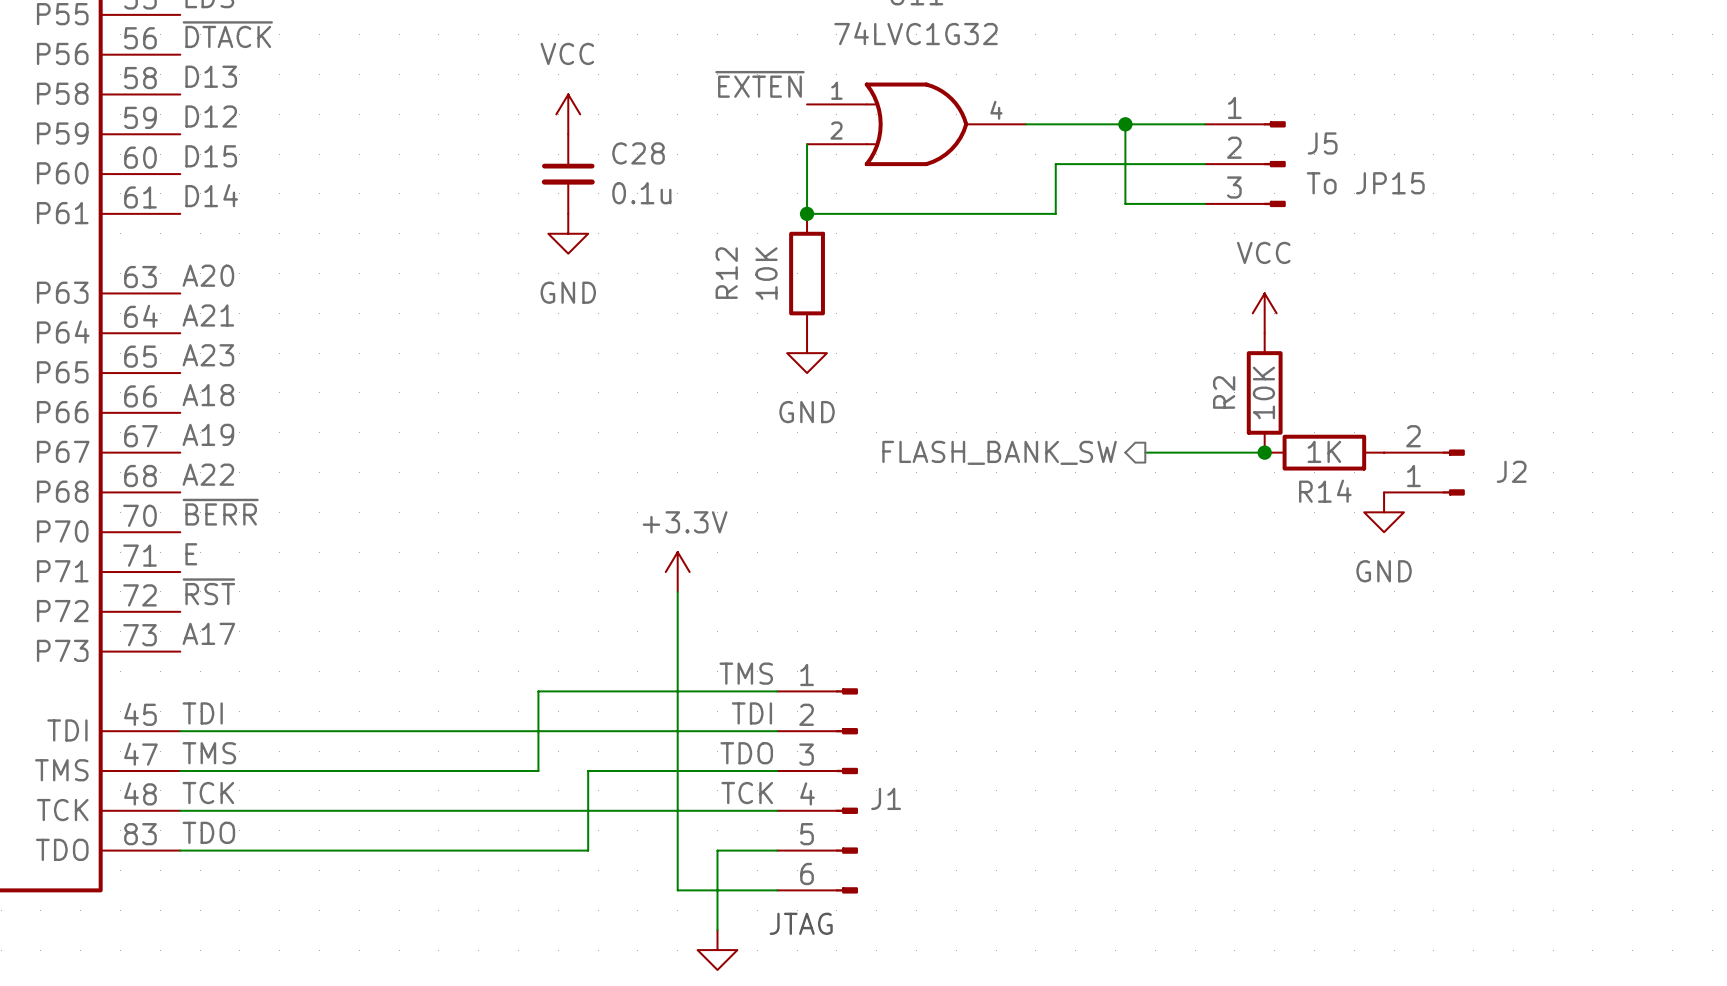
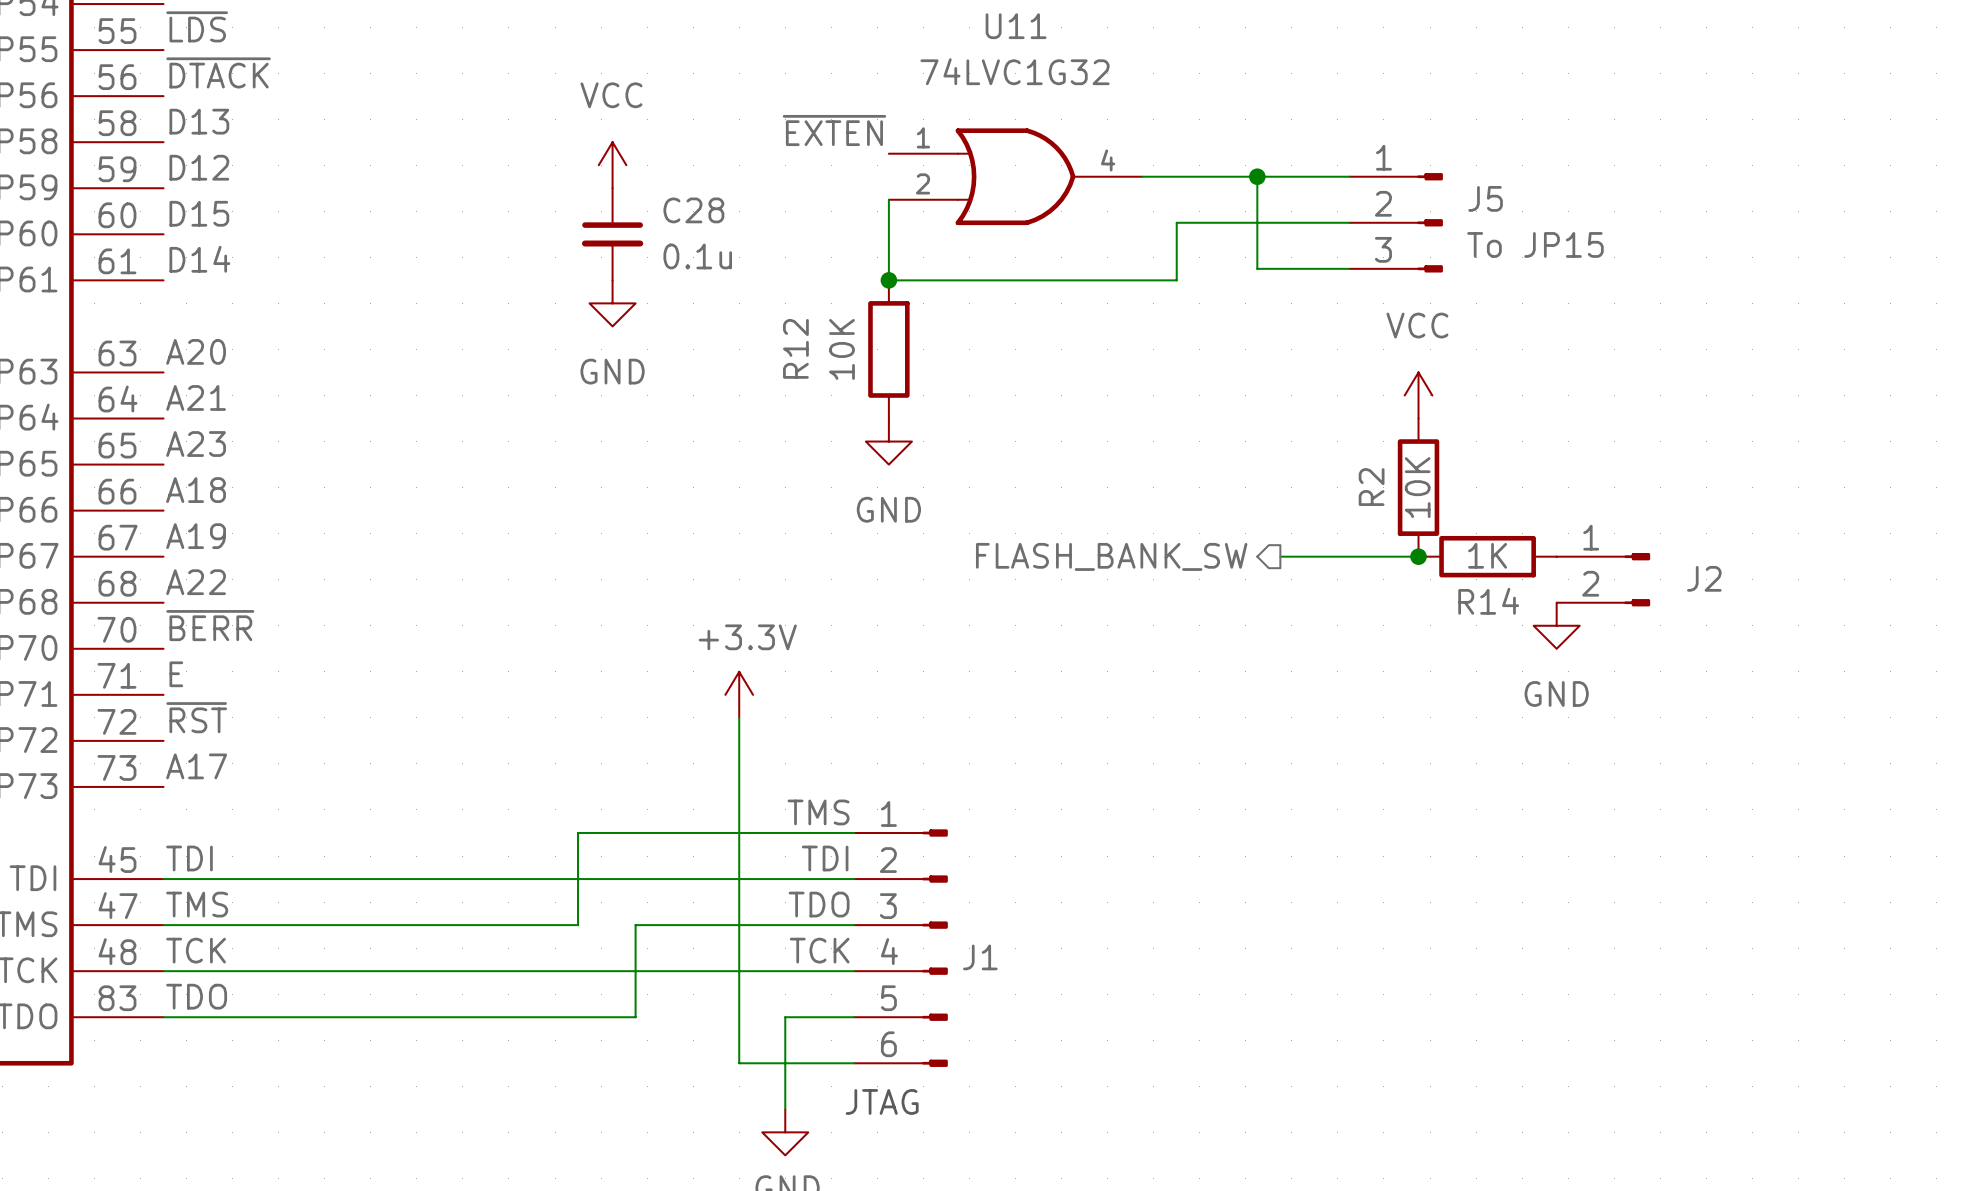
J2 flip: as is (1453, 472) -> up-down (1637, 579)

